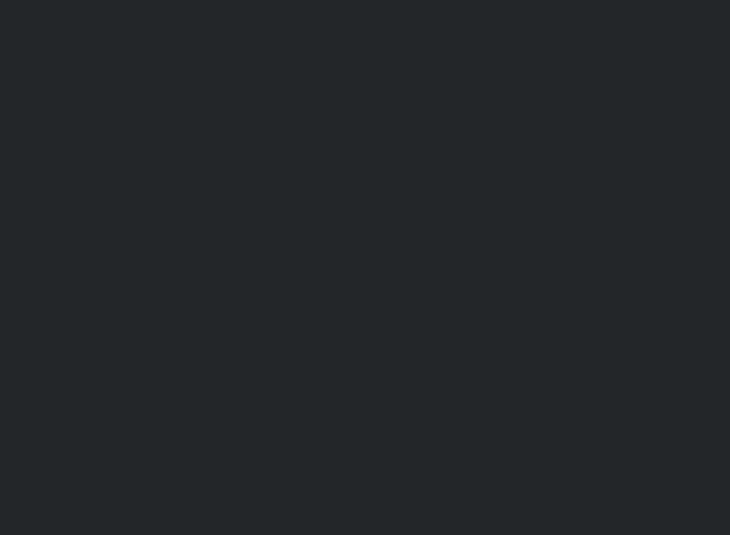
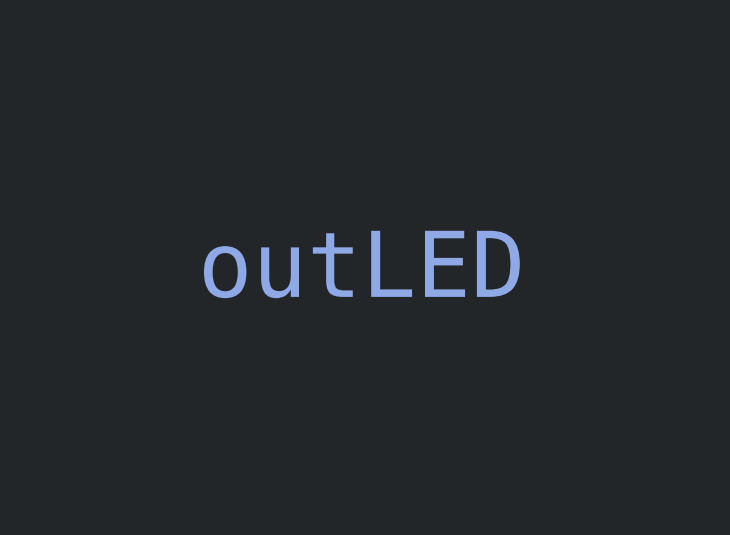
text: none -> outLED (361, 264)

